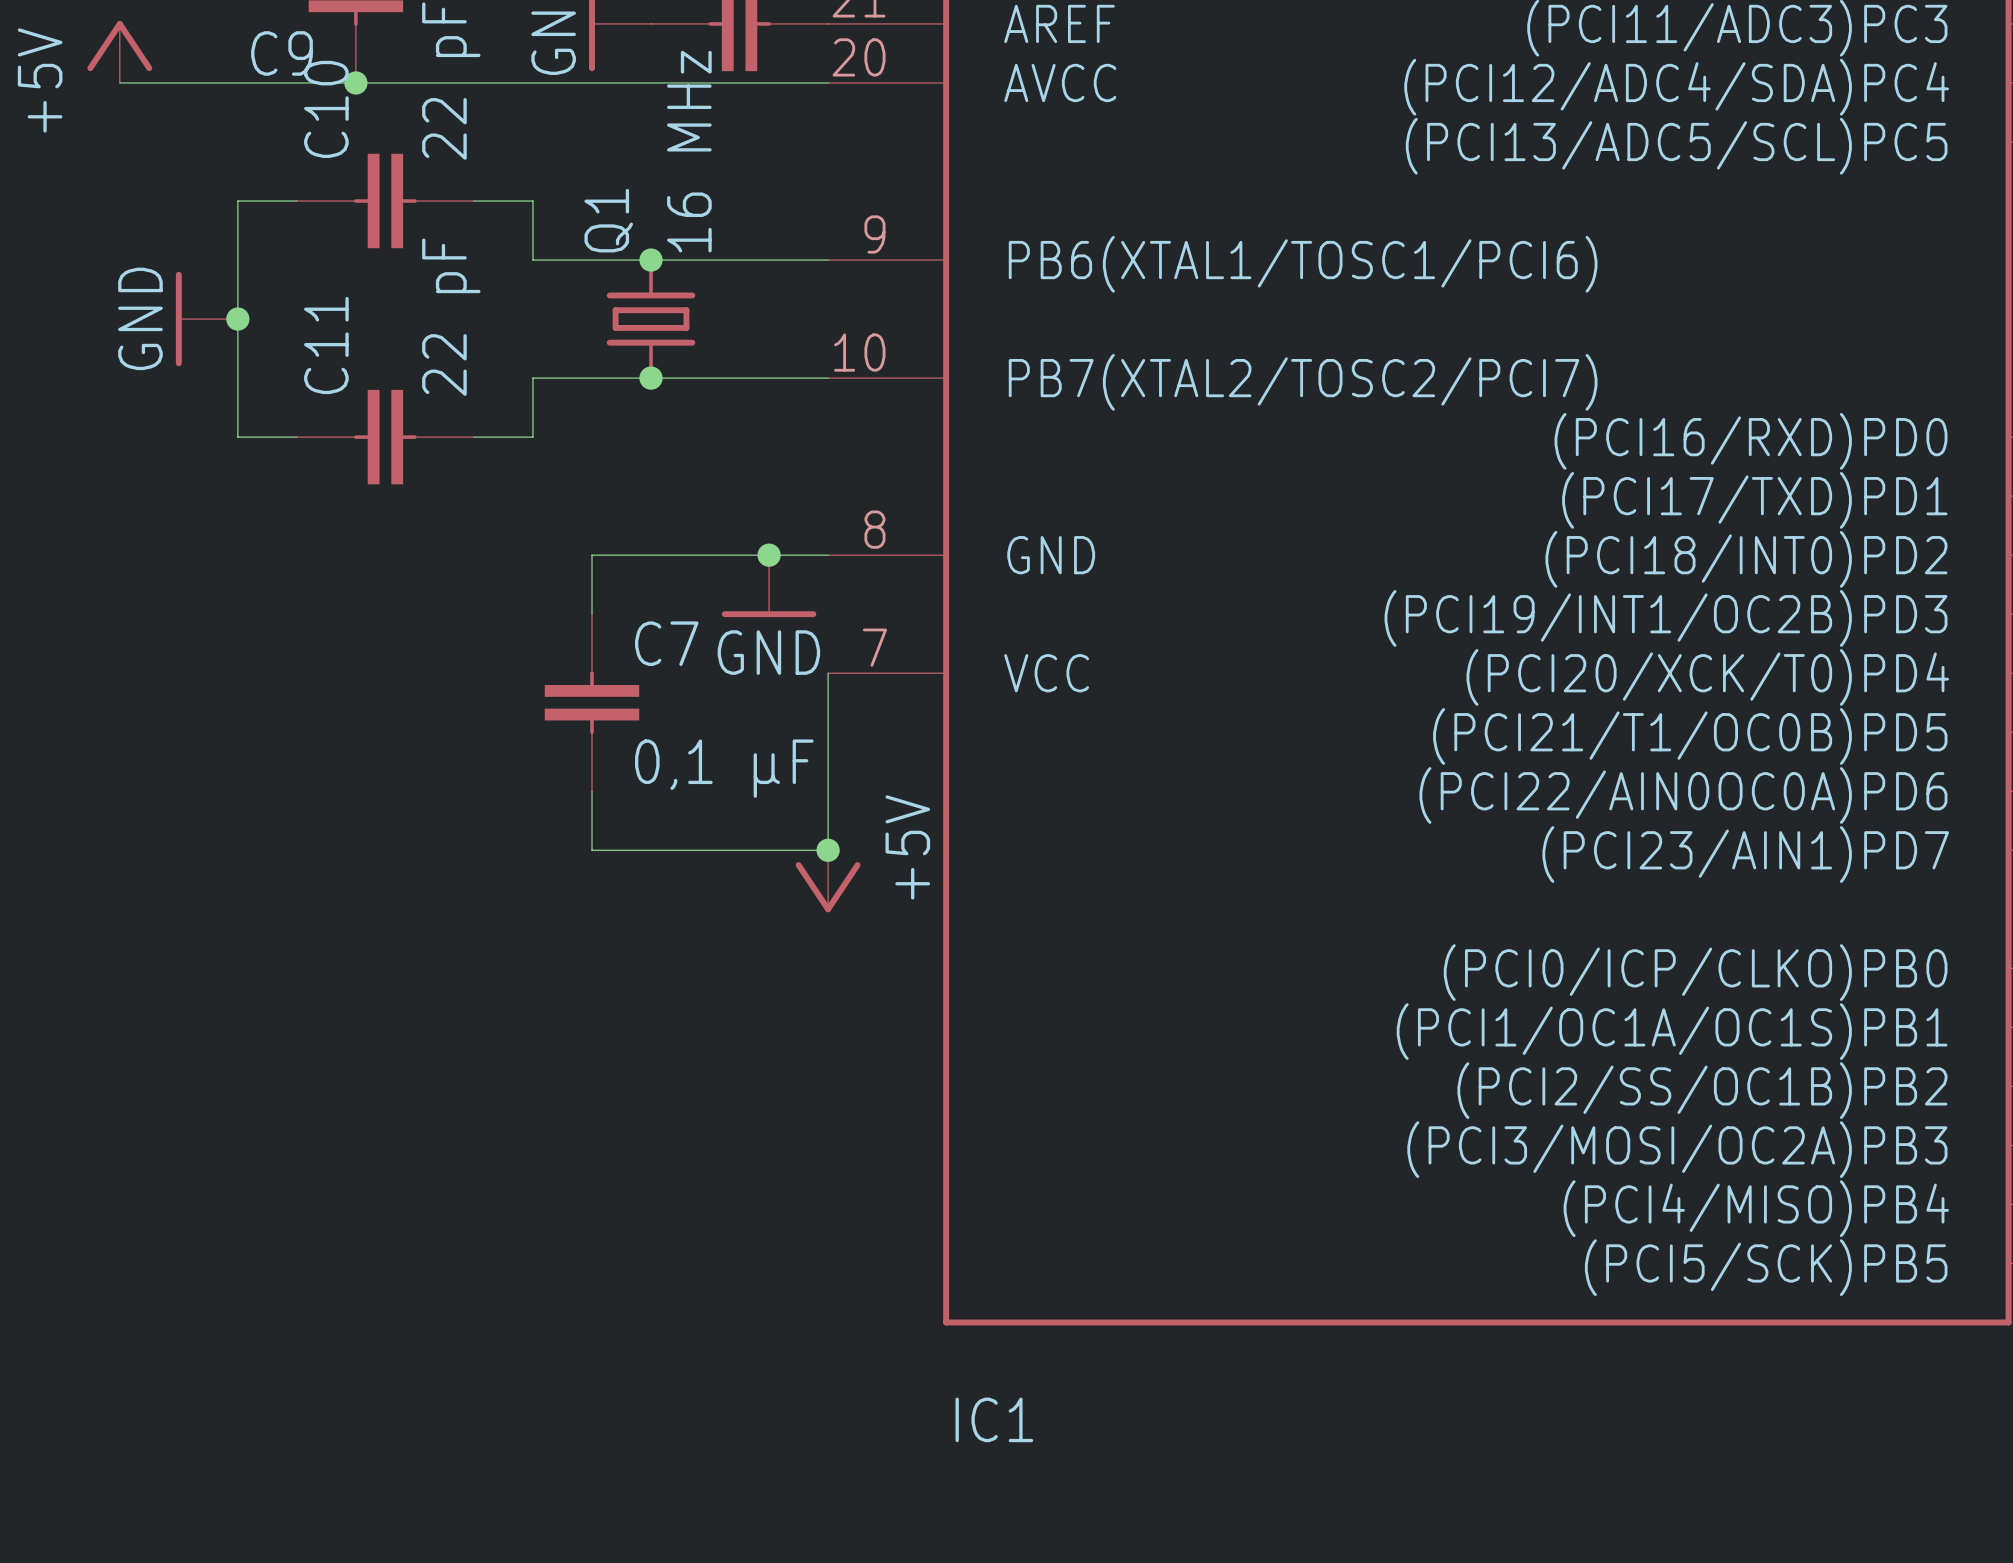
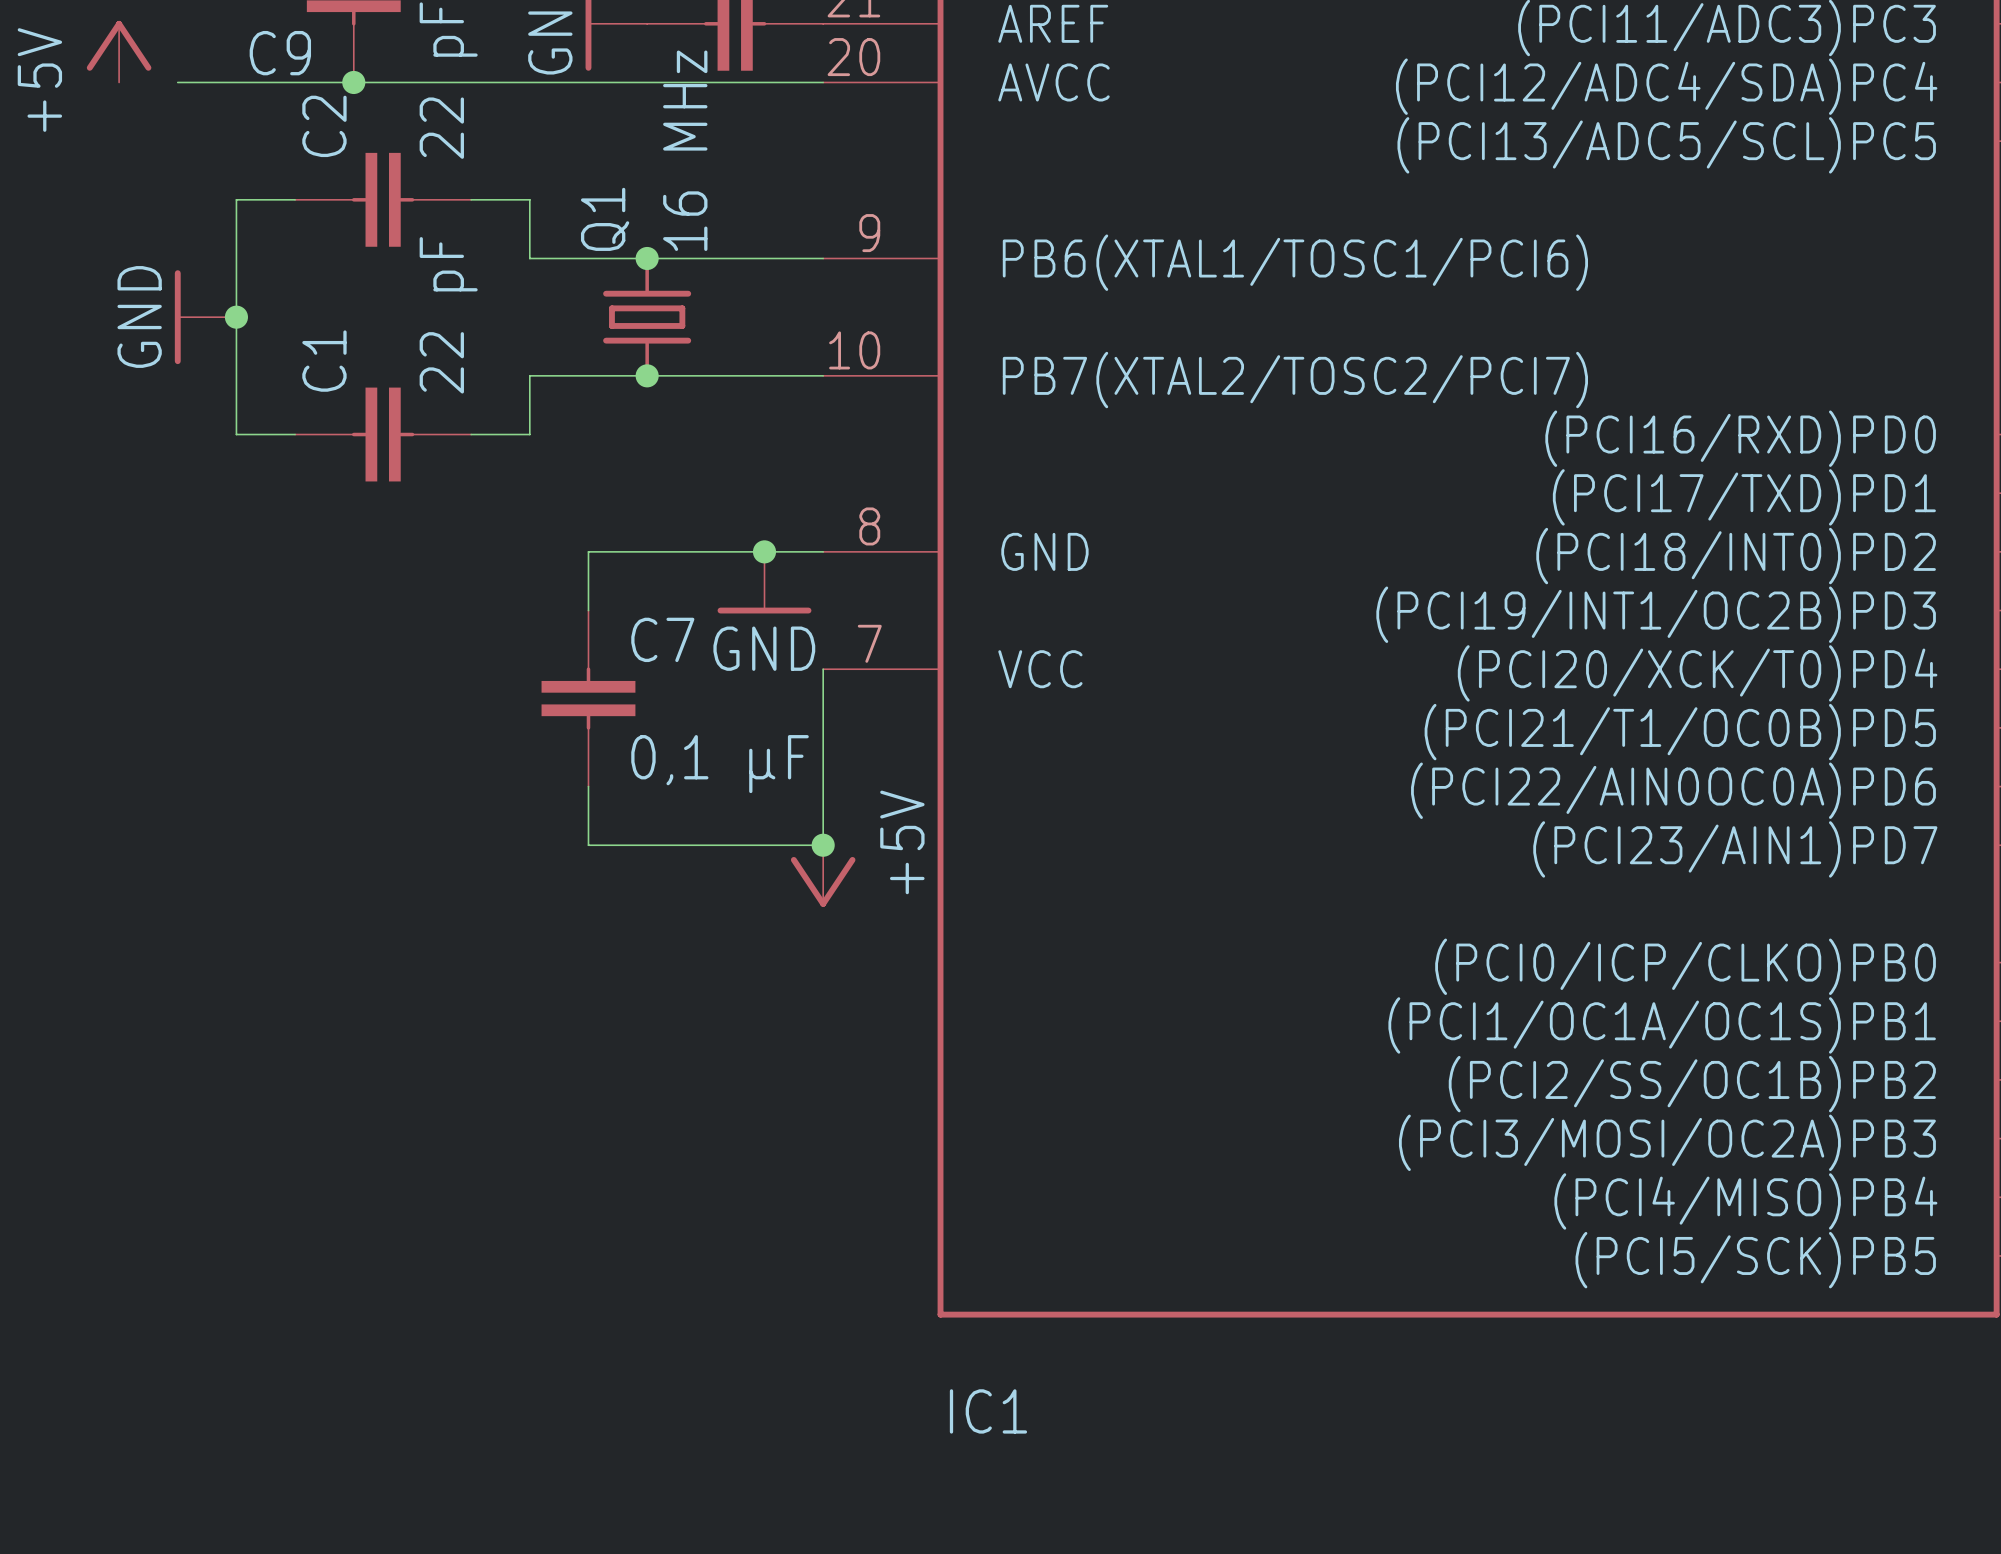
wire: (119, 82) (178, 82) -> none
C10 name: C10 (326, 109) -> C2 (324, 126)
C11 name: C11 (326, 345) -> C1 (324, 361)

